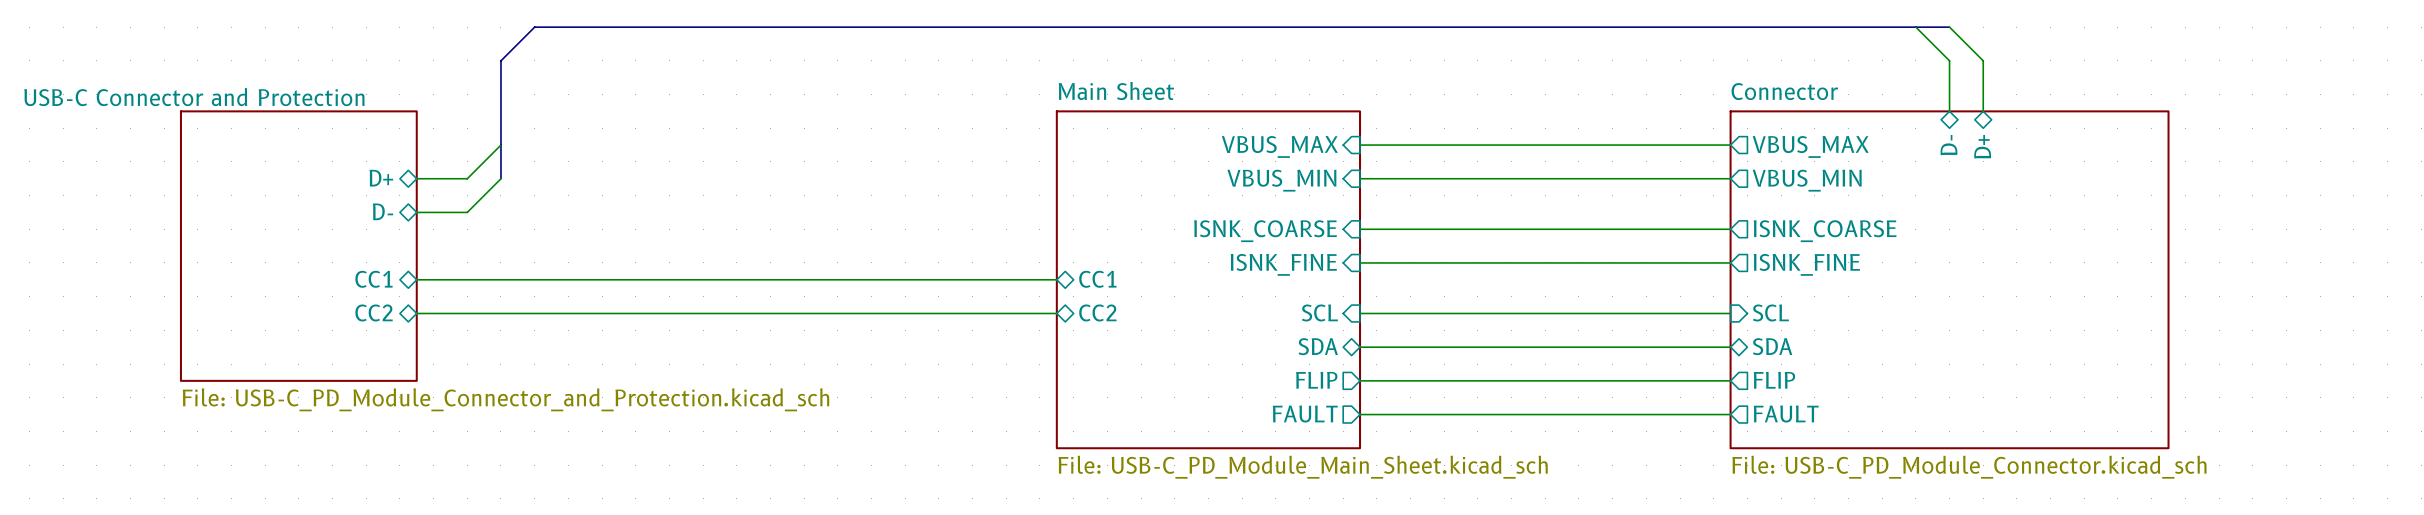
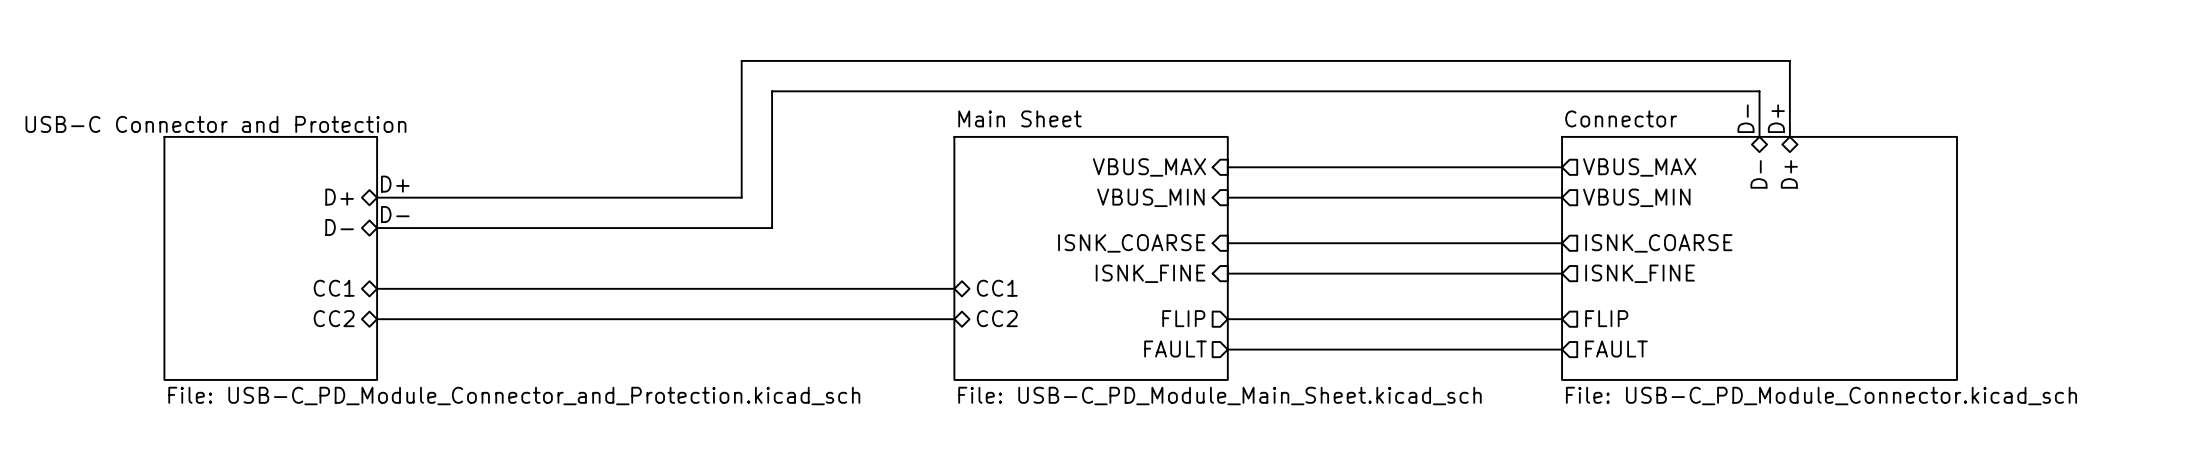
wire: (1915, 27) (1949, 60) (1949, 94) -> (377, 228) (772, 228) (772, 91) (1759, 91)
wire: (1949, 27) (1983, 60) -> none
bus: (1949, 27) (534, 27) (500, 60) (500, 178) -> none
sheet Main Sheet name position: Main Sheet (1116, 90) -> Main Sheet (1019, 118)
sheet Connector name position: Connector (1784, 91) -> Connector (1621, 118)
sheet Main Sheet shape: [1055, 110, 1362, 450] -> [953, 135, 1229, 381]
sheet Connector shape: [1729, 110, 2170, 450] -> [1561, 135, 1958, 381]
wire: none -> (1759, 106) (1759, 136)
wire: none -> (1789, 106) (1789, 136)
label: none -> D+ (1776, 118)
label: none -> D- (1745, 118)
wire: (500, 145) (467, 178) (416, 178) -> none
wire: (1360, 145) (1730, 145) -> (1227, 197) (1562, 197)
sheet pin position: D- (1948, 145) -> D- (1758, 174)
sheet pin: VBUS_MAX (1279, 146) -> none
sheet pin: VBUS_MAX (1810, 146) -> none
sheet pin position: D+ (1982, 146) -> D+ (1789, 174)
sheet pin: D+ (381, 178) -> none
wire: (500, 178) (467, 212) -> (1789, 60) (741, 60) (741, 197) (422, 197)
sheet pin: VBUS_MIN (1281, 180) -> VBUS_MAX (1149, 167)
sheet pin: VBUS_MIN (1807, 180) -> VBUS_MAX (1639, 167)
label: none -> D+ (395, 184)
sheet pin: D- (383, 211) -> D+ (339, 197)
sheet pin: none -> VBUS_MIN (1150, 197)
sheet pin: none -> VBUS_MIN (1636, 197)
wire: (1360, 229) (1730, 229) -> (1227, 273) (1562, 273)
label: none -> D- (395, 214)
sheet pin: ISNK_COARSE (1265, 231) -> none
sheet pin: ISNK_COARSE (1825, 231) -> none
sheet pin: none -> D- (339, 227)
sheet USB-C Connector and Protection position: (298, 246) -> (270, 258)
sheet pin: ISNK_FINE (1283, 264) -> ISNK_COARSE (1131, 243)
sheet pin: ISNK_FINE (1806, 264) -> ISNK_COARSE (1658, 243)
sheet pin: CC1 (373, 279) -> none
wire: (416, 279) (1056, 279) -> (377, 319) (954, 319)
sheet pin: CC1 (1097, 279) -> none
sheet pin: none -> ISNK_FINE (1150, 273)
sheet pin: none -> ISNK_FINE (1640, 273)
sheet pin: CC2 (374, 312) -> CC1 (334, 288)
sheet pin: CC2 (1097, 312) -> CC1 (997, 288)
sheet pin: SCL (1319, 312) -> none
sheet pin: SCL (1770, 312) -> none
wire: (1360, 313) (1730, 313) -> none
sheet pin: none -> CC2 (334, 318)
sheet pin: none -> CC2 (997, 318)
sheet pin shape: bidirectional (1318, 346) -> output (1183, 318)
sheet pin: SDA (1318, 346) -> FLIP (1183, 318)
sheet pin shape: bidirectional (1772, 346) -> output (1606, 318)
sheet pin: SDA (1772, 346) -> FLIP (1606, 318)
sheet pin: FLIP (1316, 380) -> FAULT (1175, 349)
sheet pin: FLIP (1774, 380) -> FAULT (1616, 349)
sheet pin: FAULT (1305, 414) -> none
wire: (1360, 414) (1730, 414) -> none
sheet pin: FAULT (1786, 414) -> none
sheet Main Sheet value position: File: USB-C_PD_Module_Main_Sheet.kicad_sch (1303, 467) -> File: USB-C_PD_Module_Main_Sheet.kicad_sch (1219, 396)
sheet Connector value position: File: USB-C_PD_Module_Connector.kicad_sch (1969, 467) -> File: USB-C_PD_Module_Connector.kicad_sch (1821, 396)

